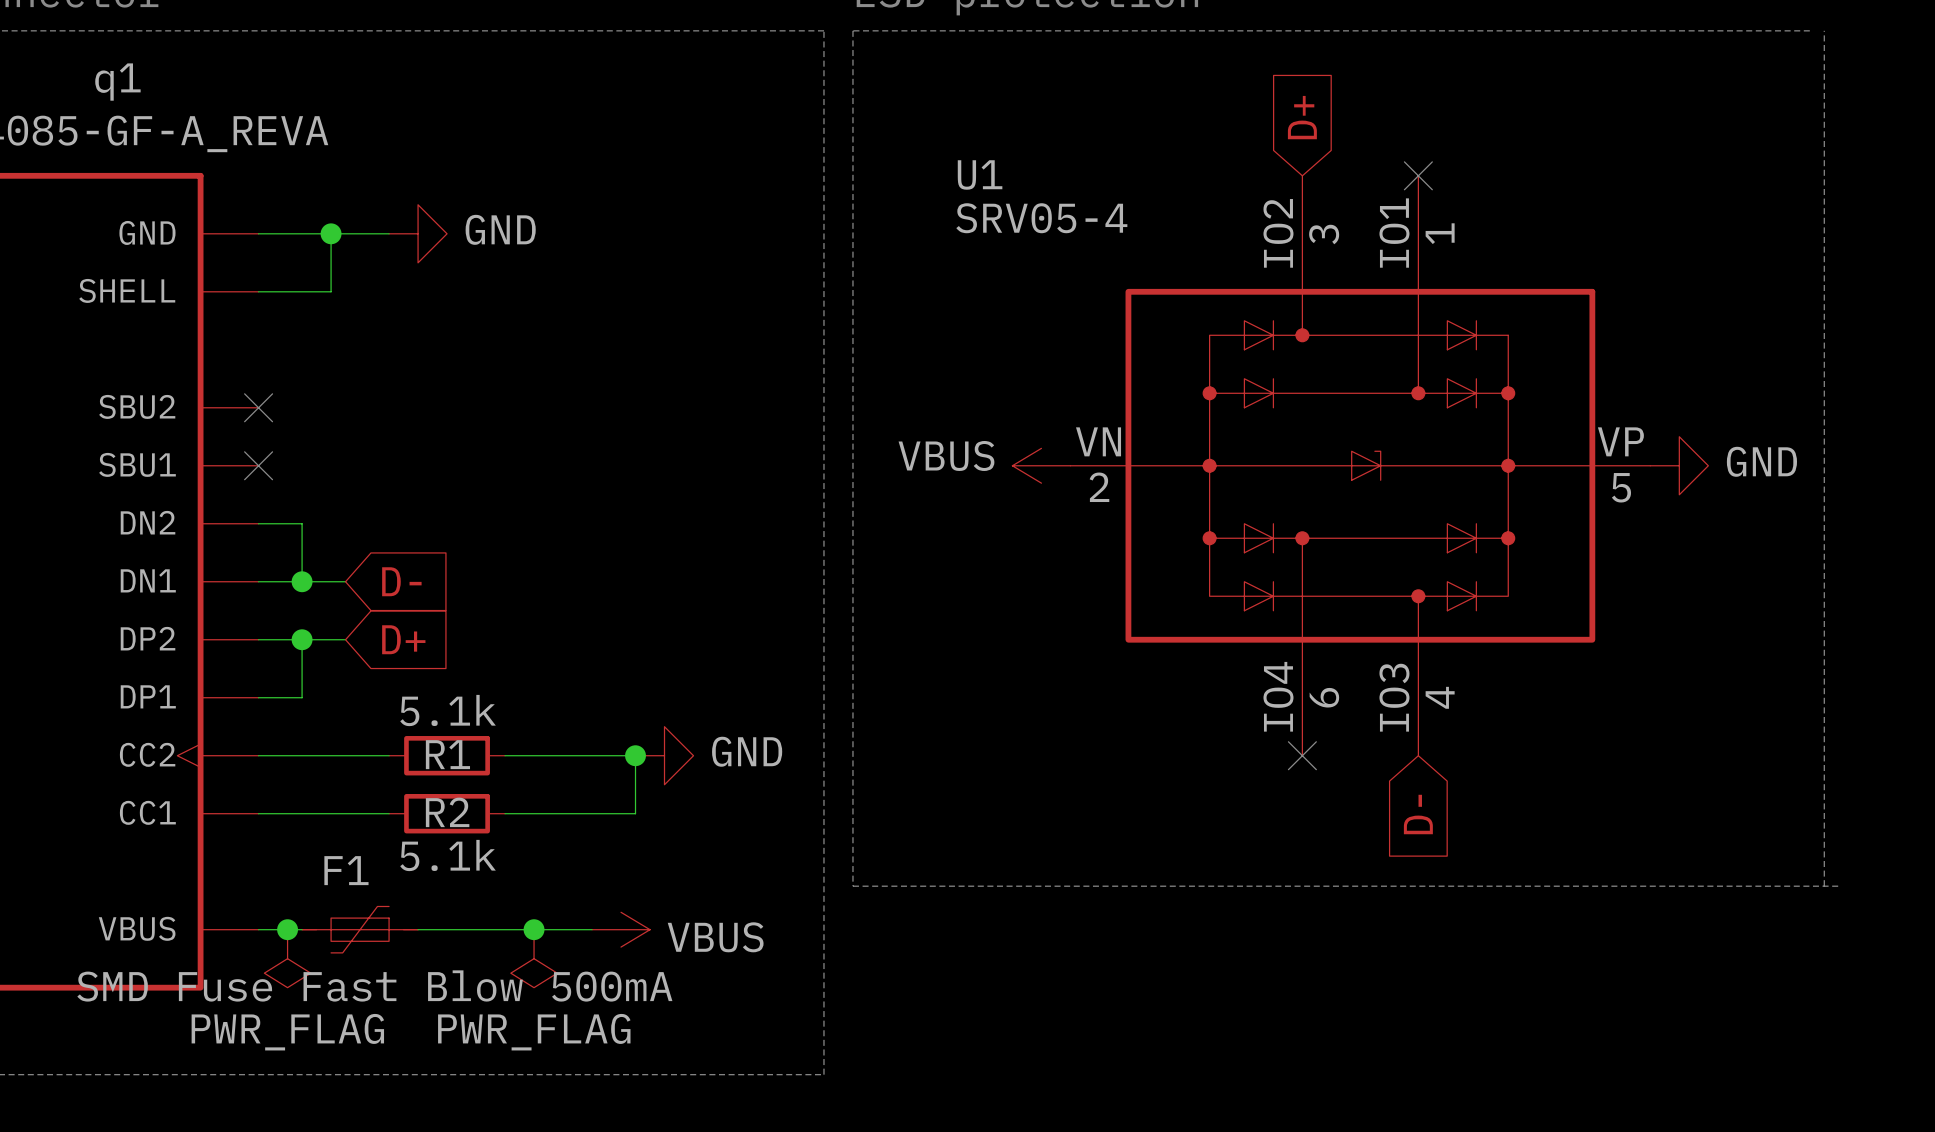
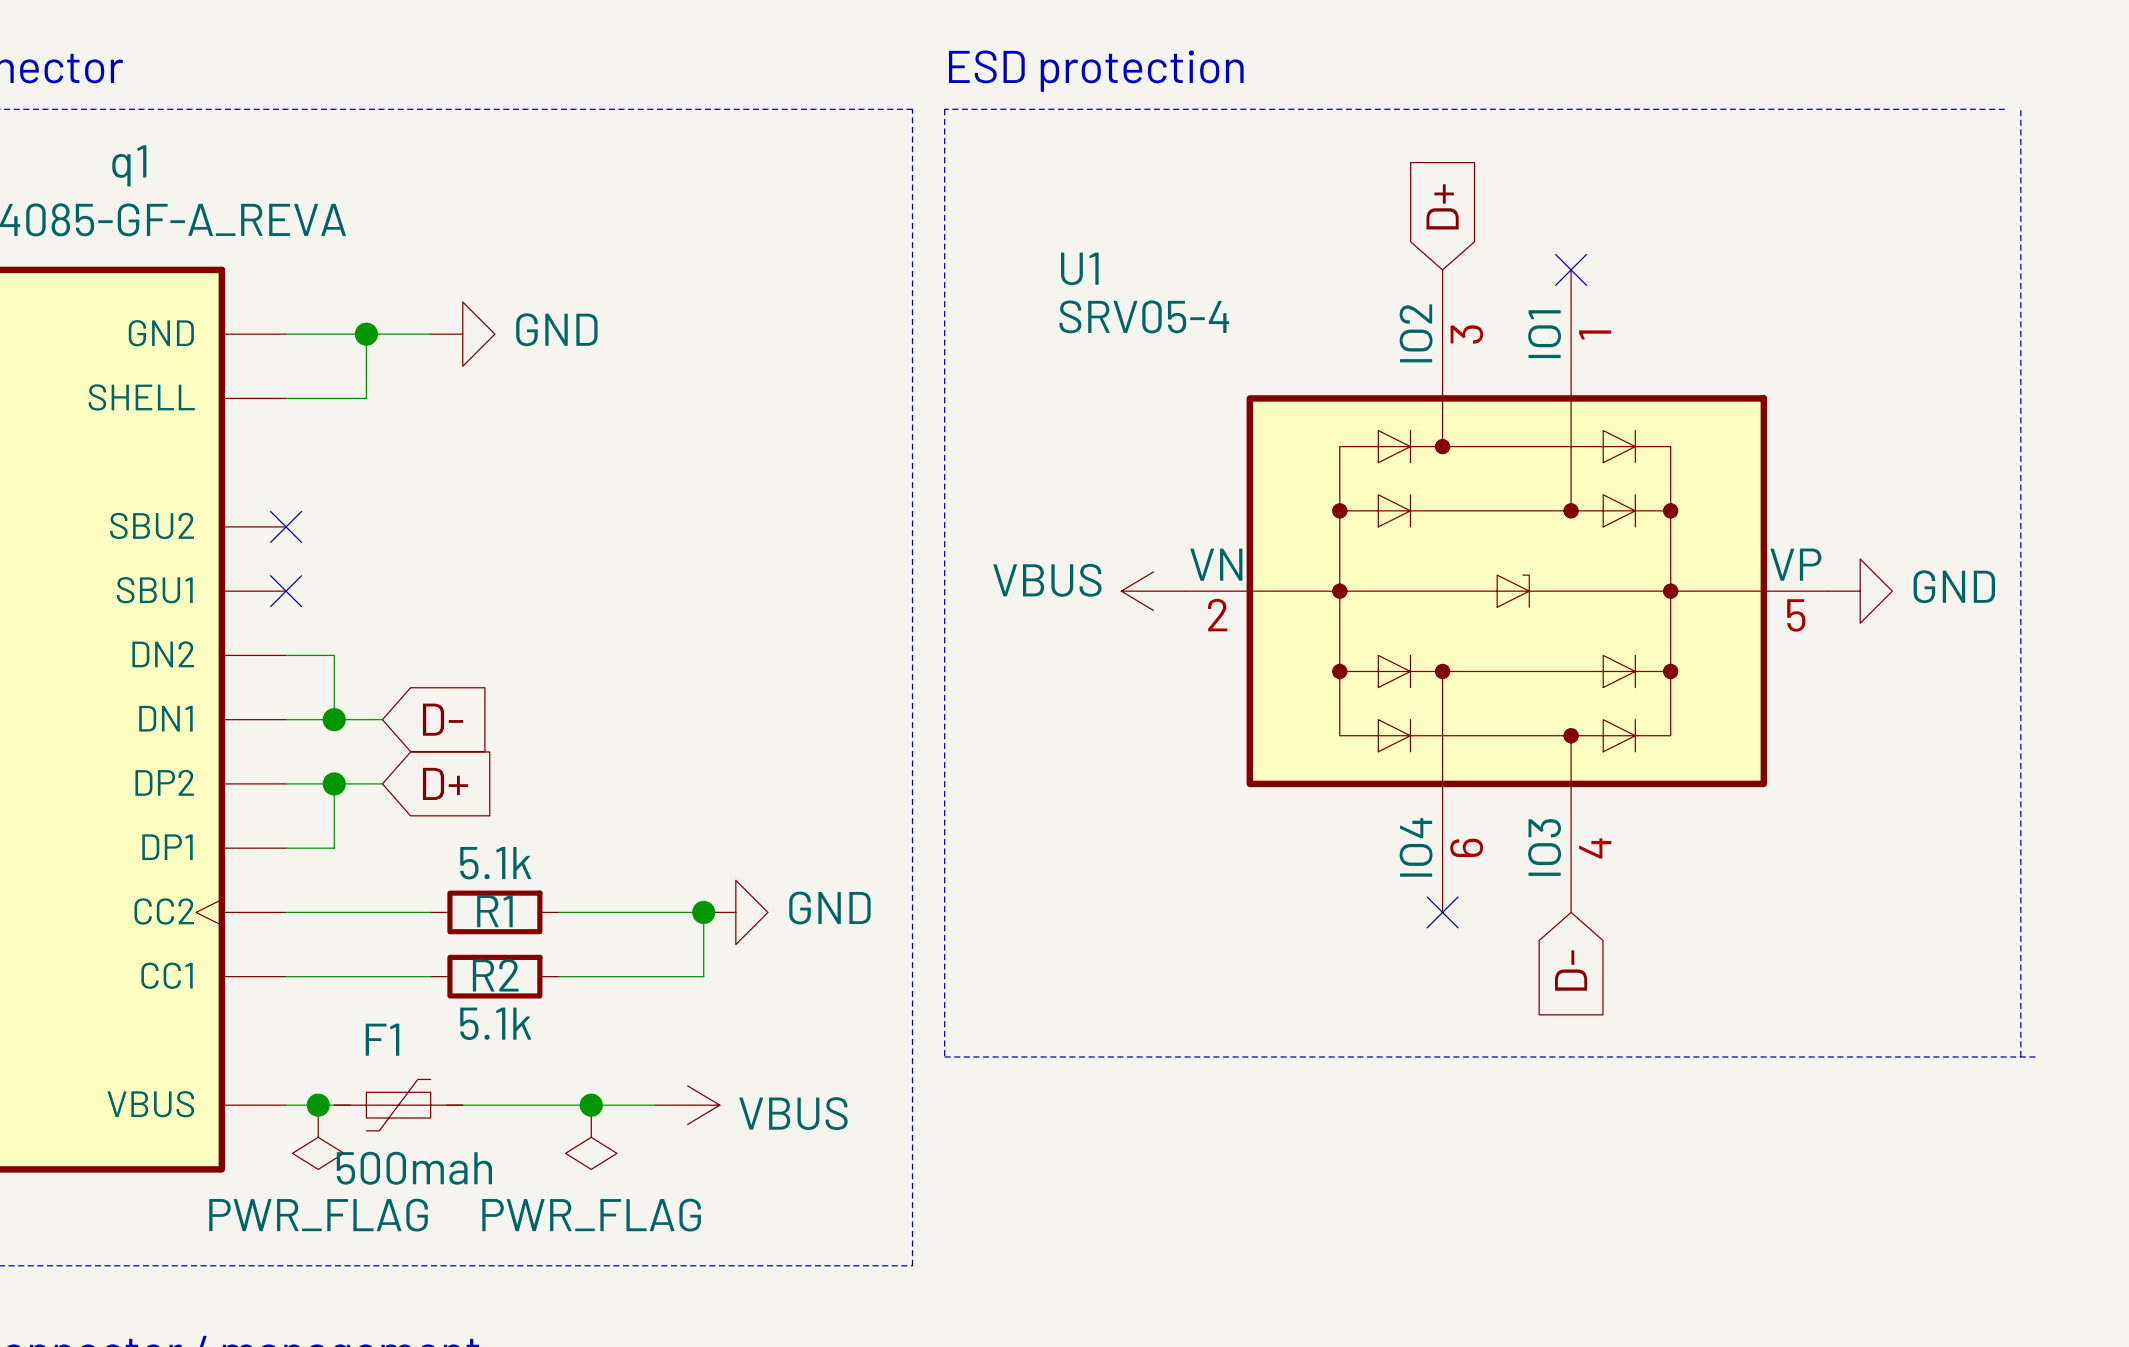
F1 value: SMD Fuse Fast Blow 500mA (374, 985) -> 500mah (414, 1168)

